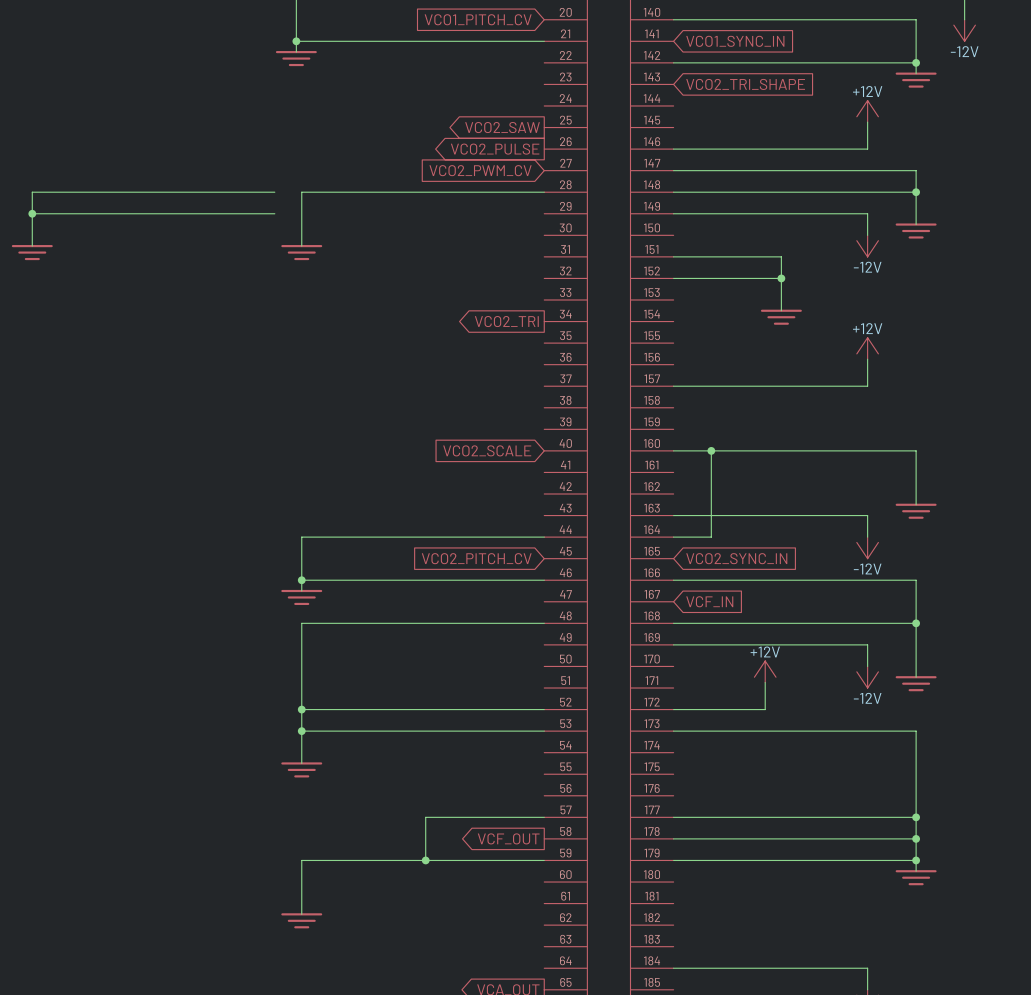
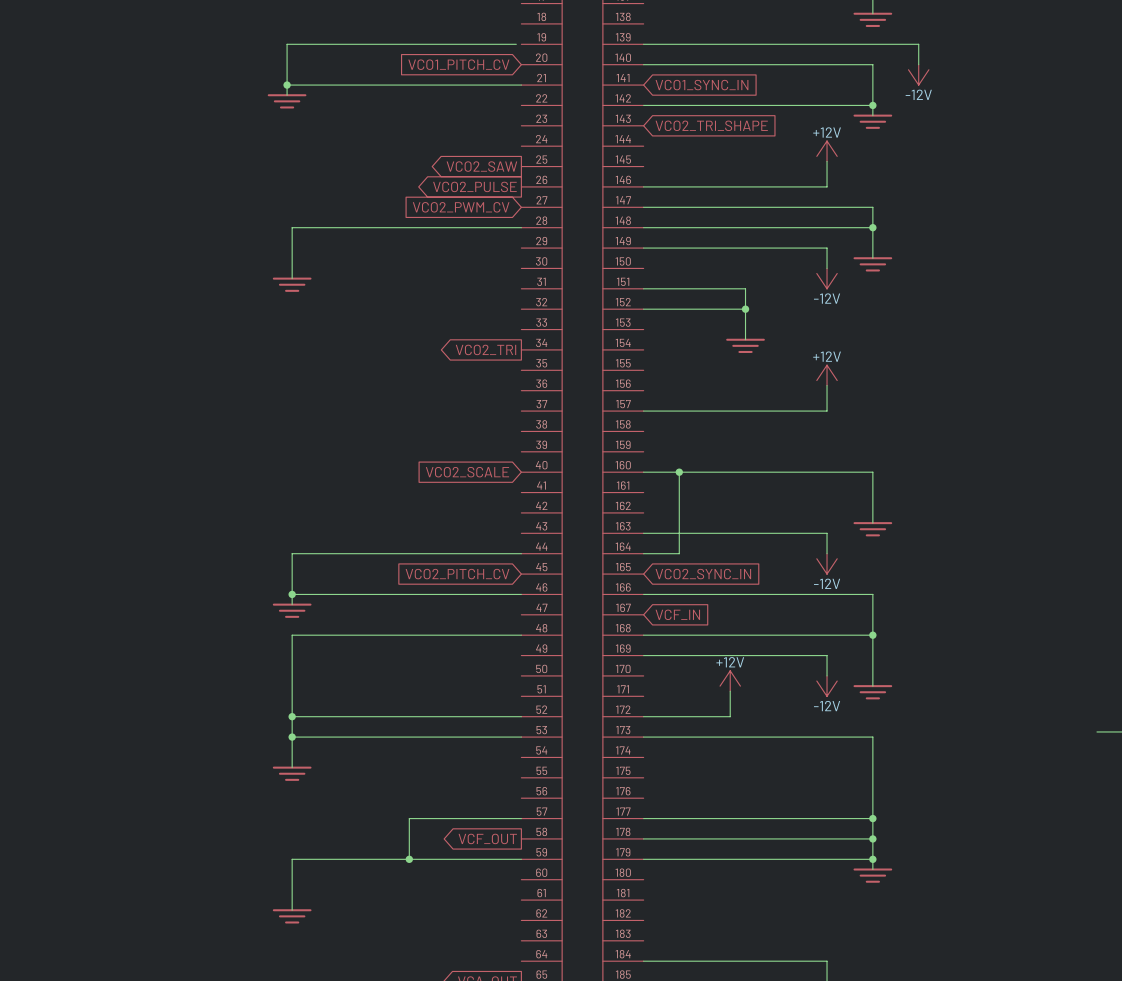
wire: (274, 192) (32, 192) (32, 246) -> none
wire: (32, 213) (274, 213) -> none
junction: (32, 213) -> none
power symbol: (32, 252) -> none

